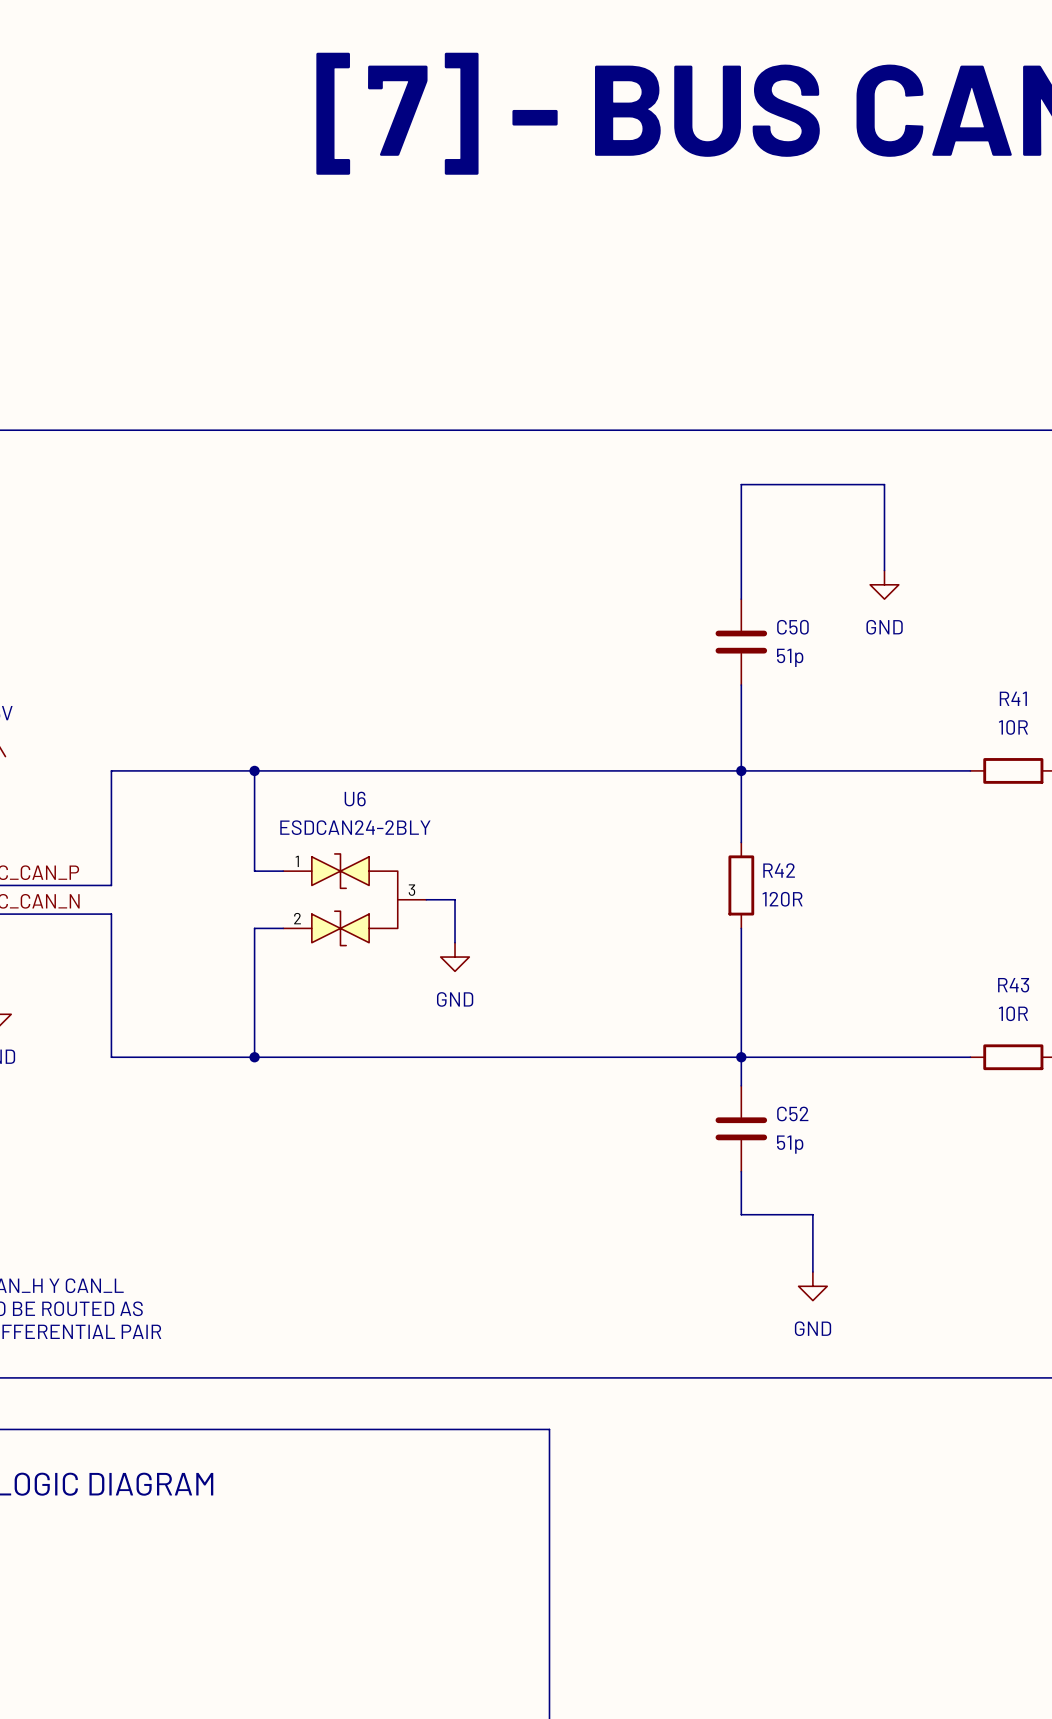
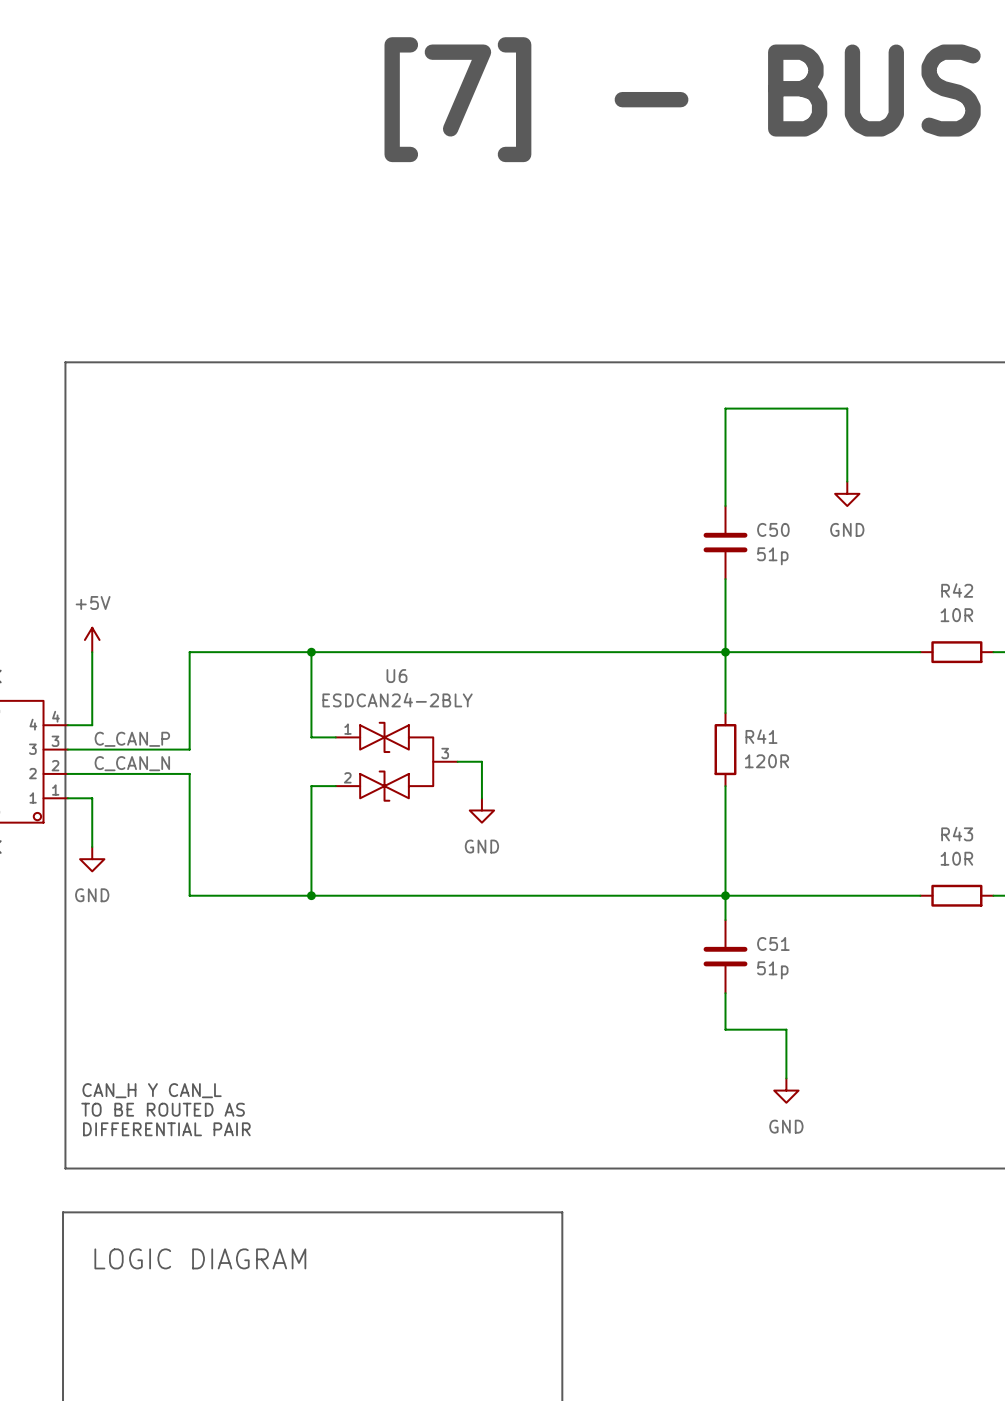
R41 name: R41 (1013, 698) -> R42 (957, 590)
R42 name: R42 (779, 870) -> R41 (761, 736)
C52 name: C52 (792, 1113) -> C51 (773, 943)

